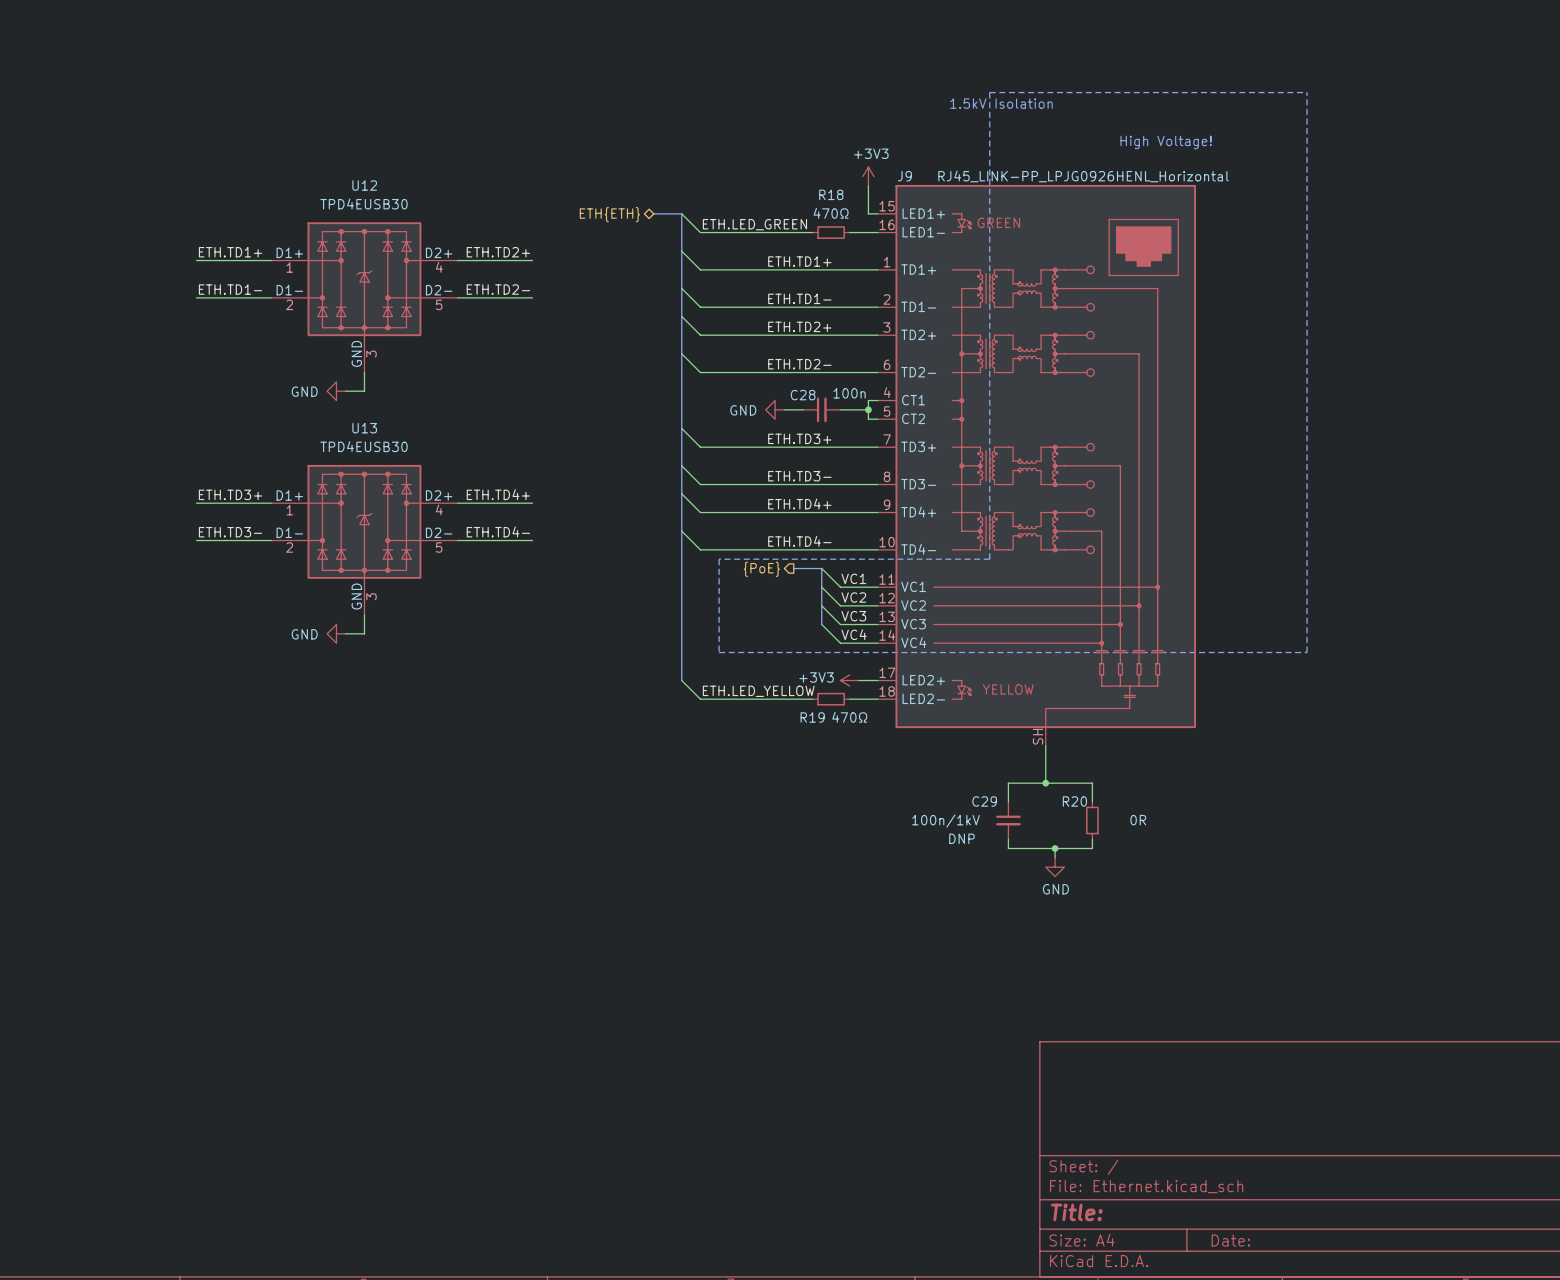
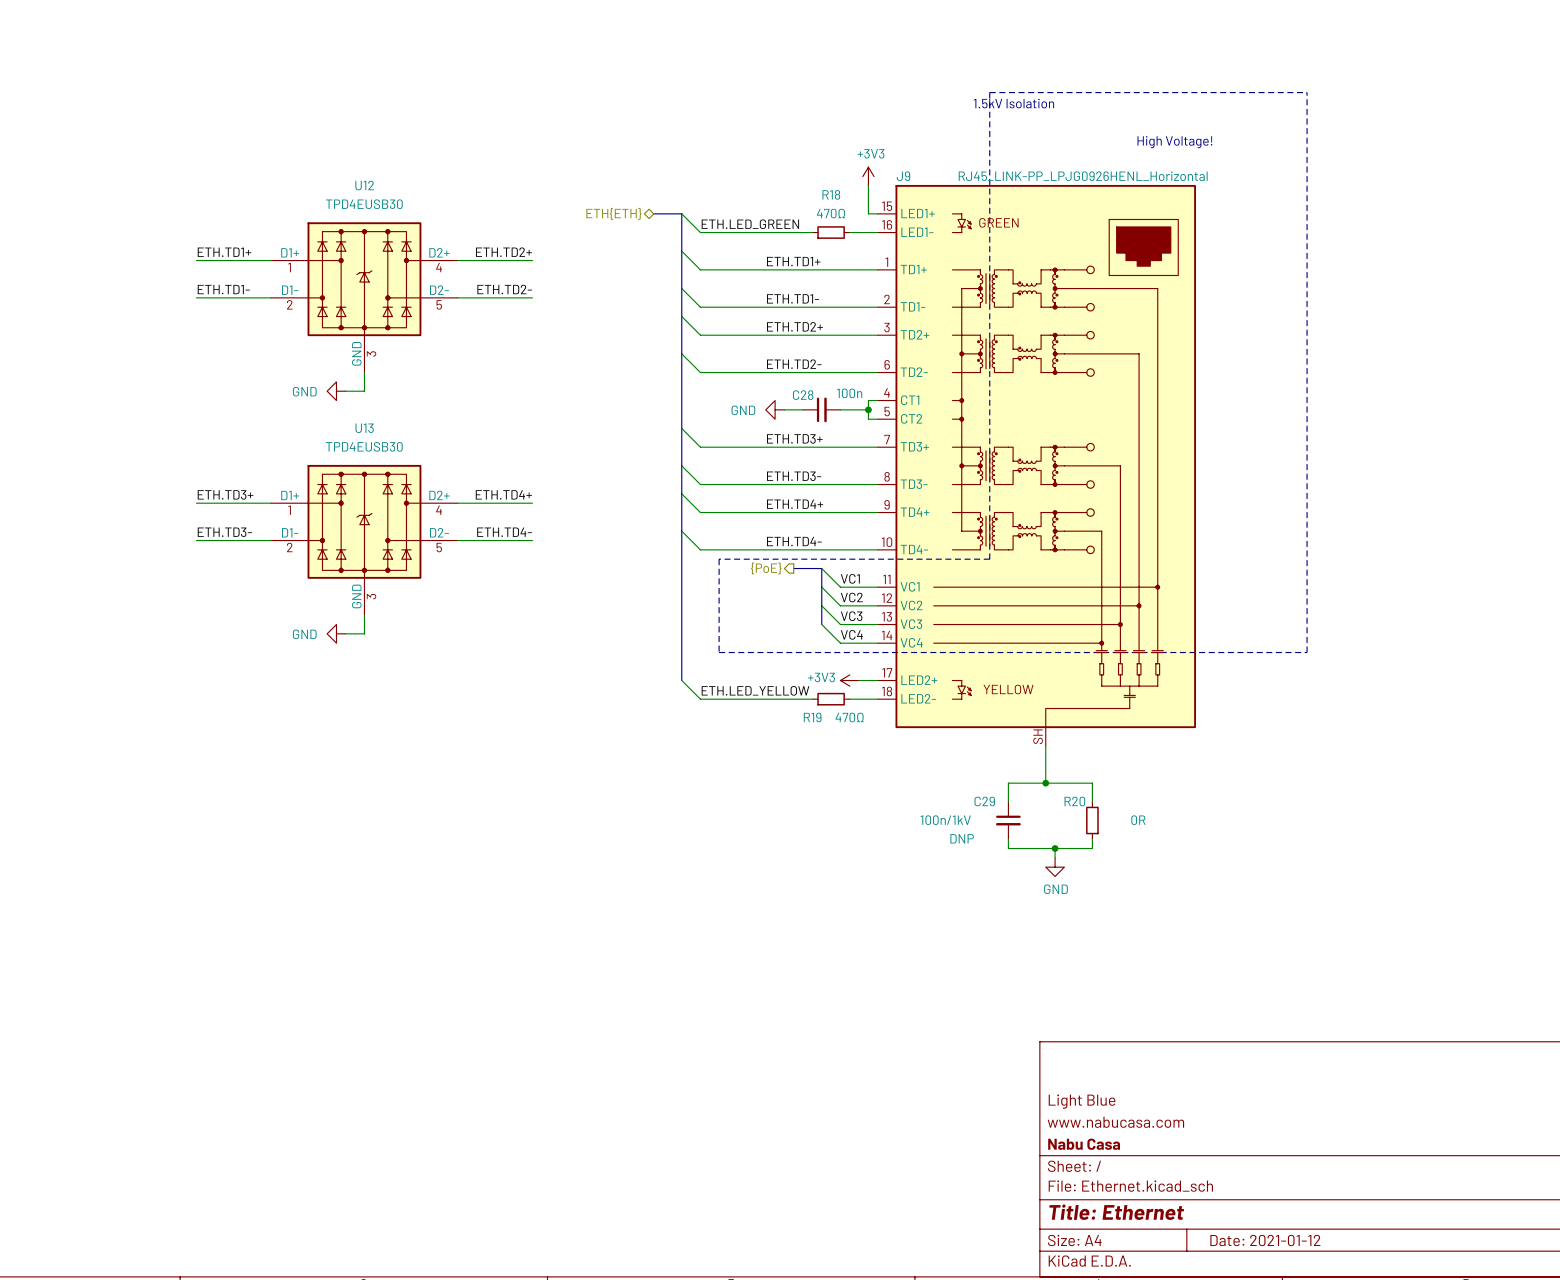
title block: none -> Light Blue (1082, 1101)
title block: none -> www.nabucasa.com (1115, 1122)
title block: none -> Nabu Casa (1084, 1144)
title block: Title: (1076, 1212) -> Title: Ethernet (1116, 1212)
title block: Date: (1230, 1240) -> Date: 2021-01-12 (1265, 1240)

